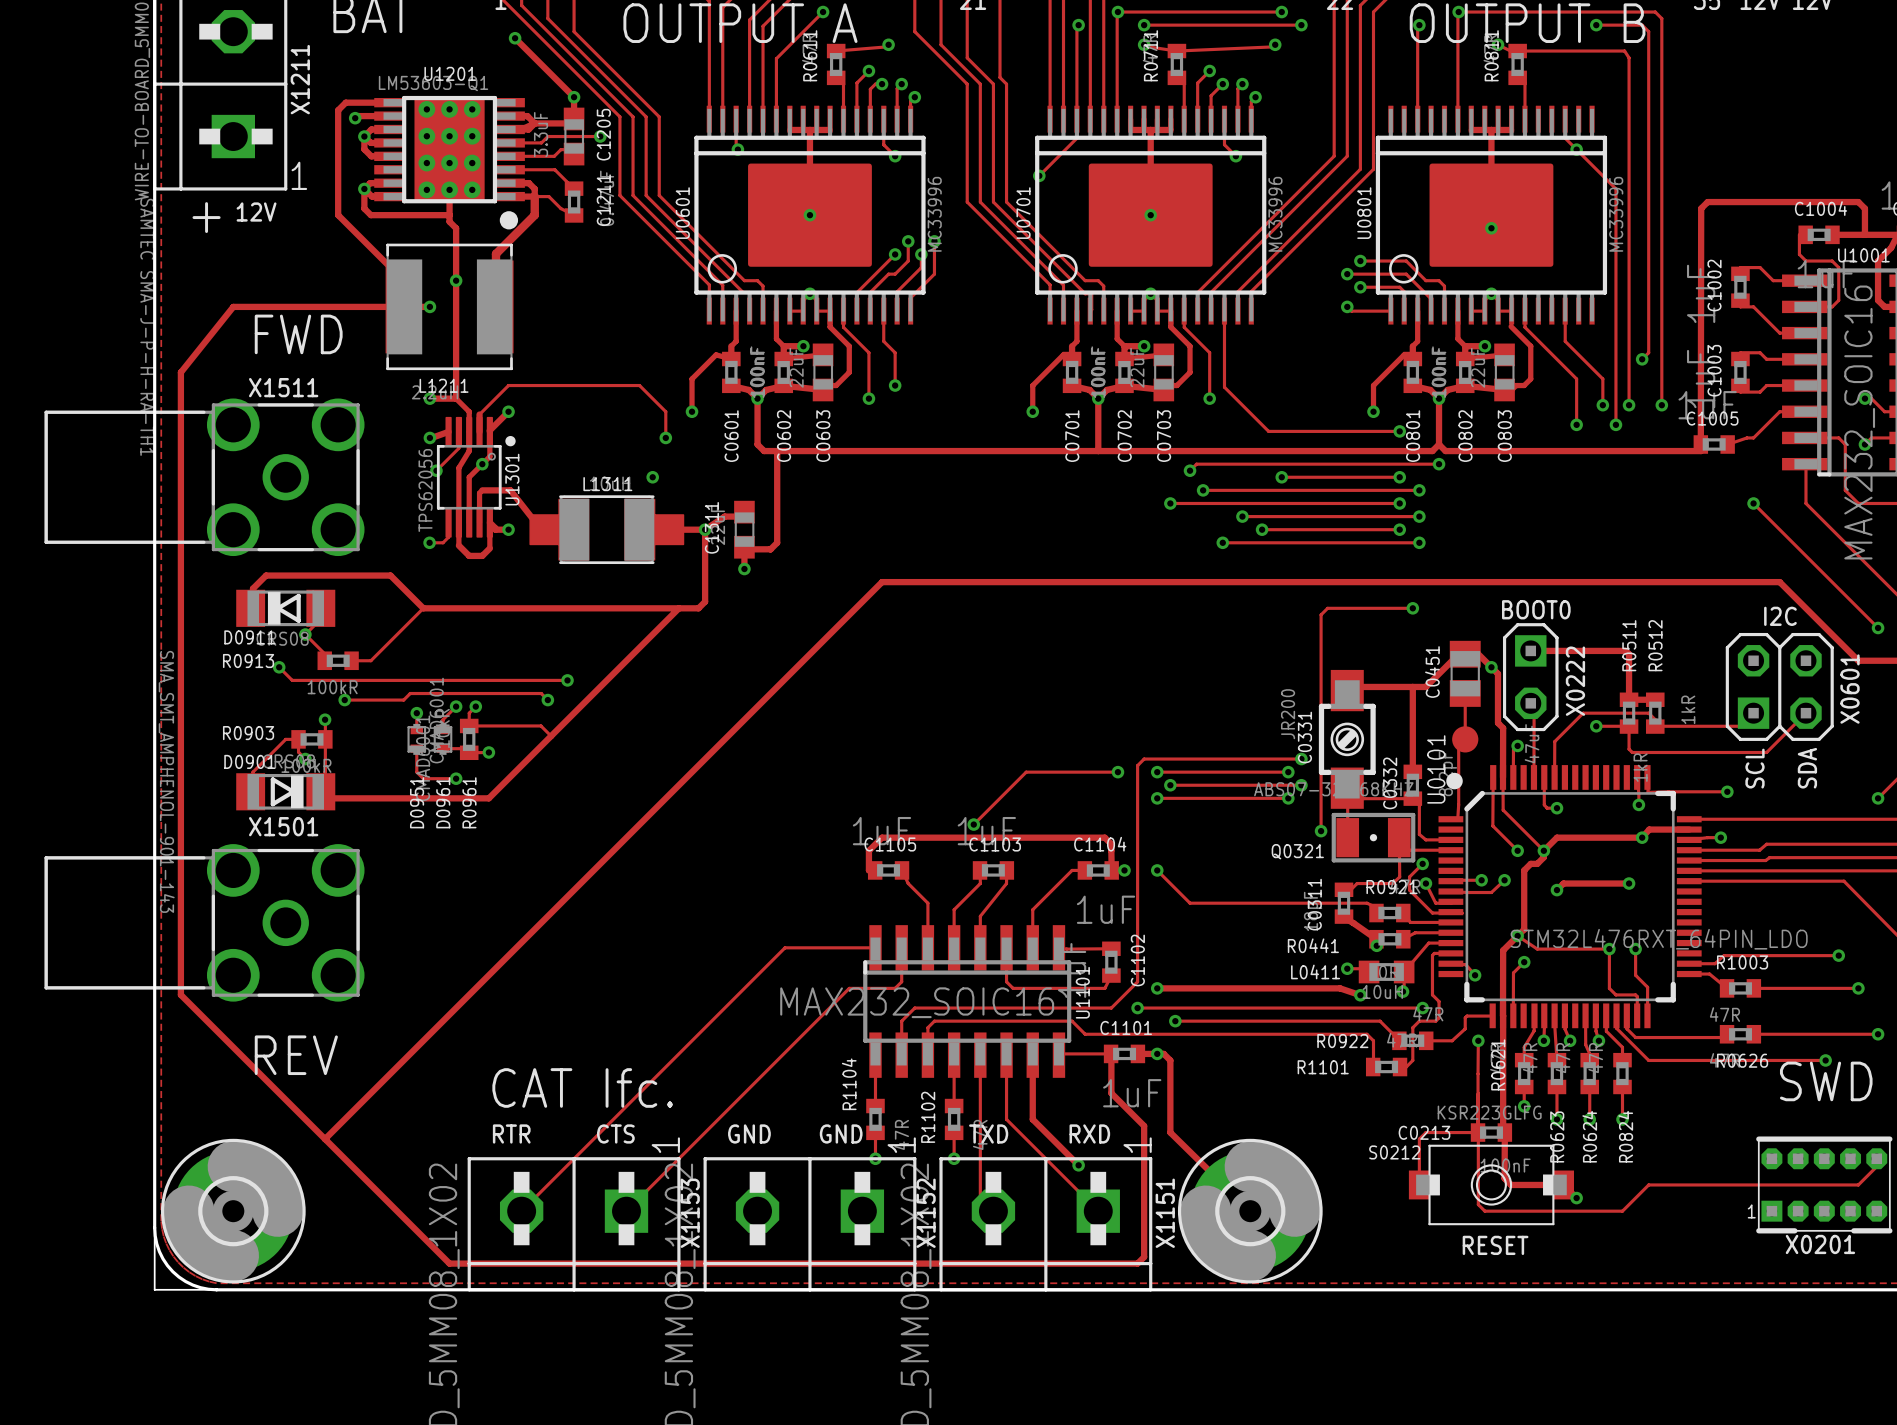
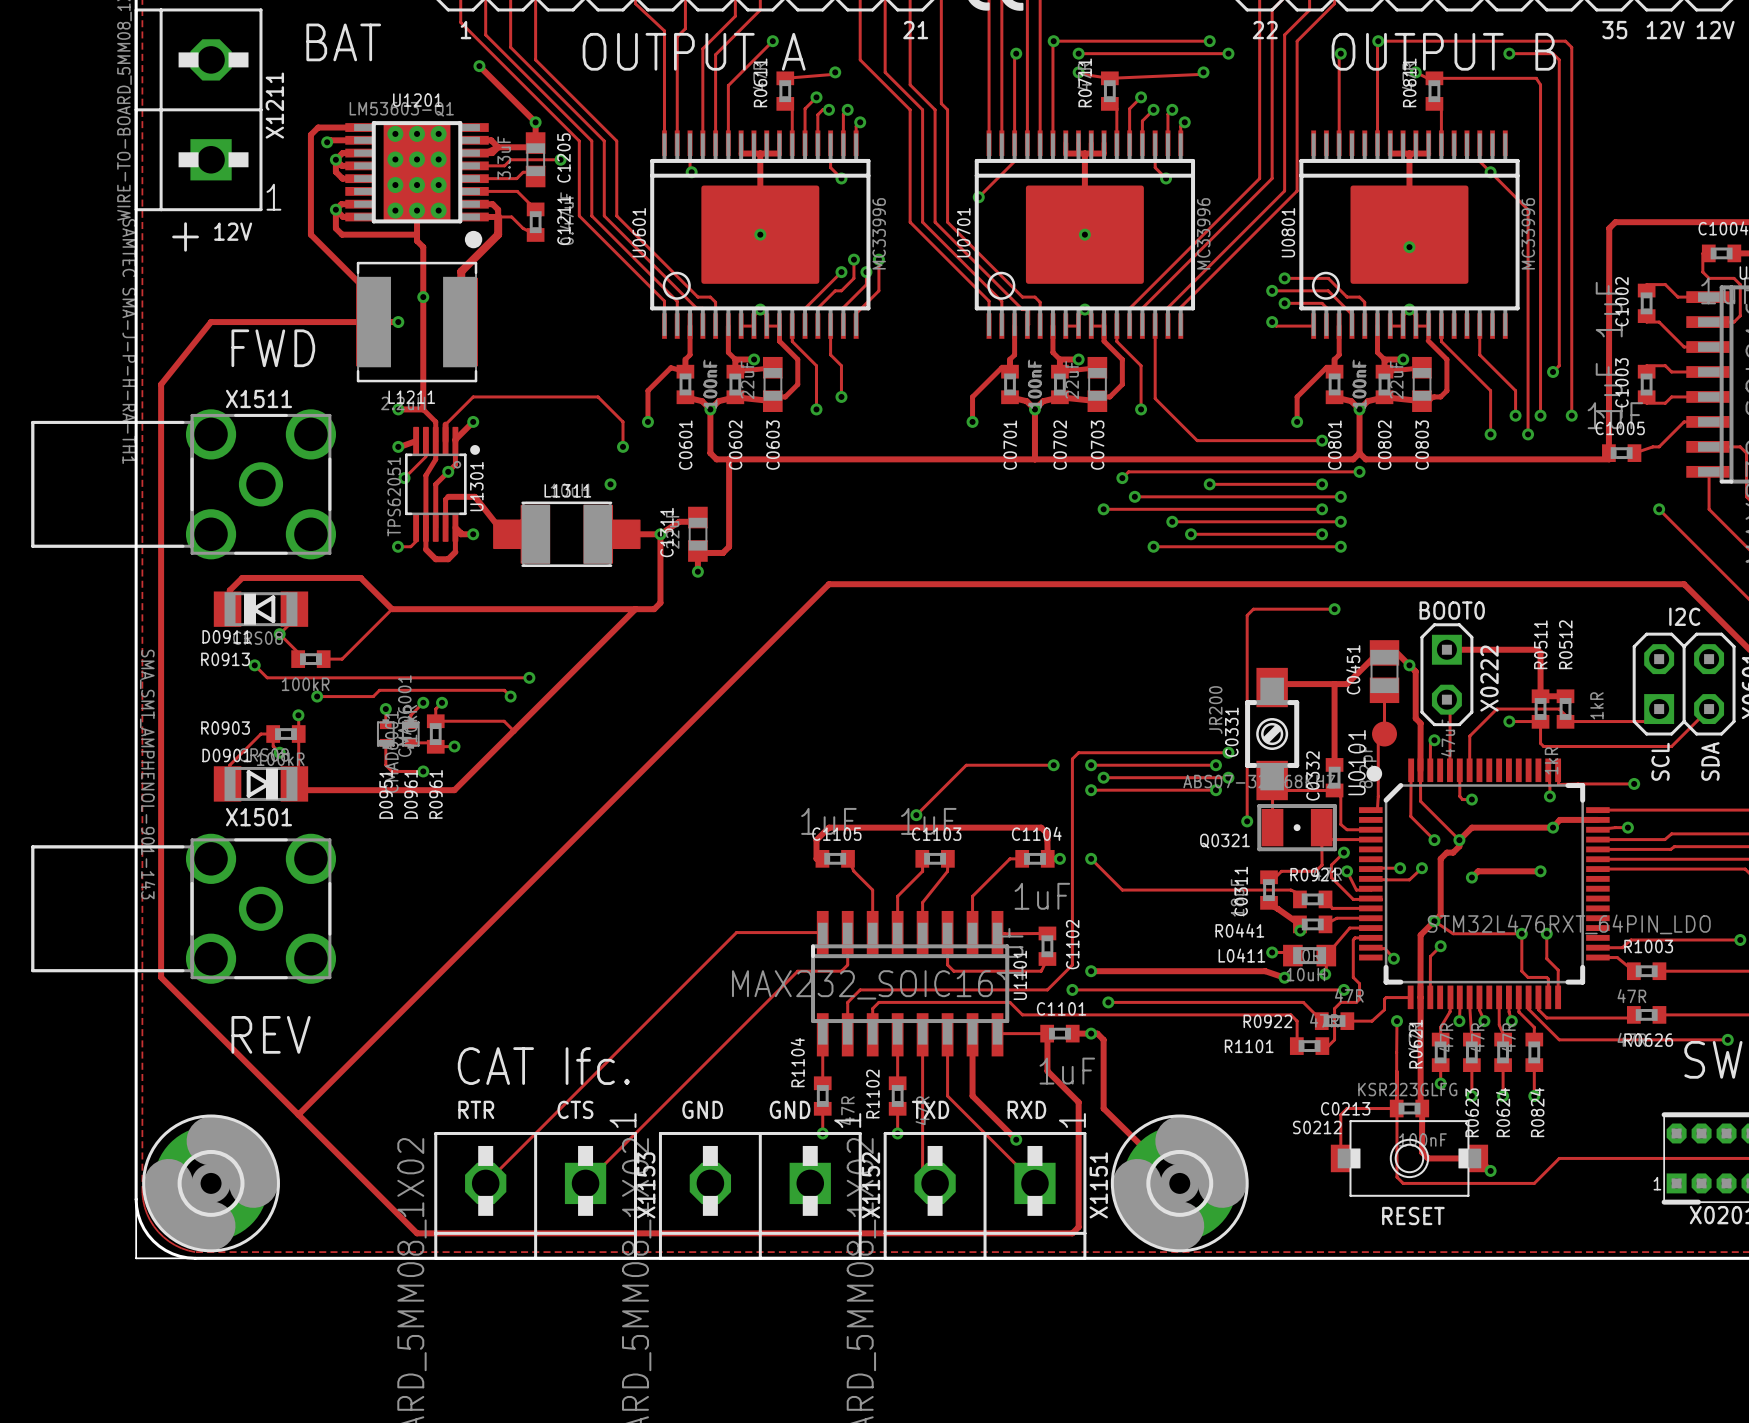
U1301 value: TPS62056 (425, 490) -> TPS62051 (394, 496)

